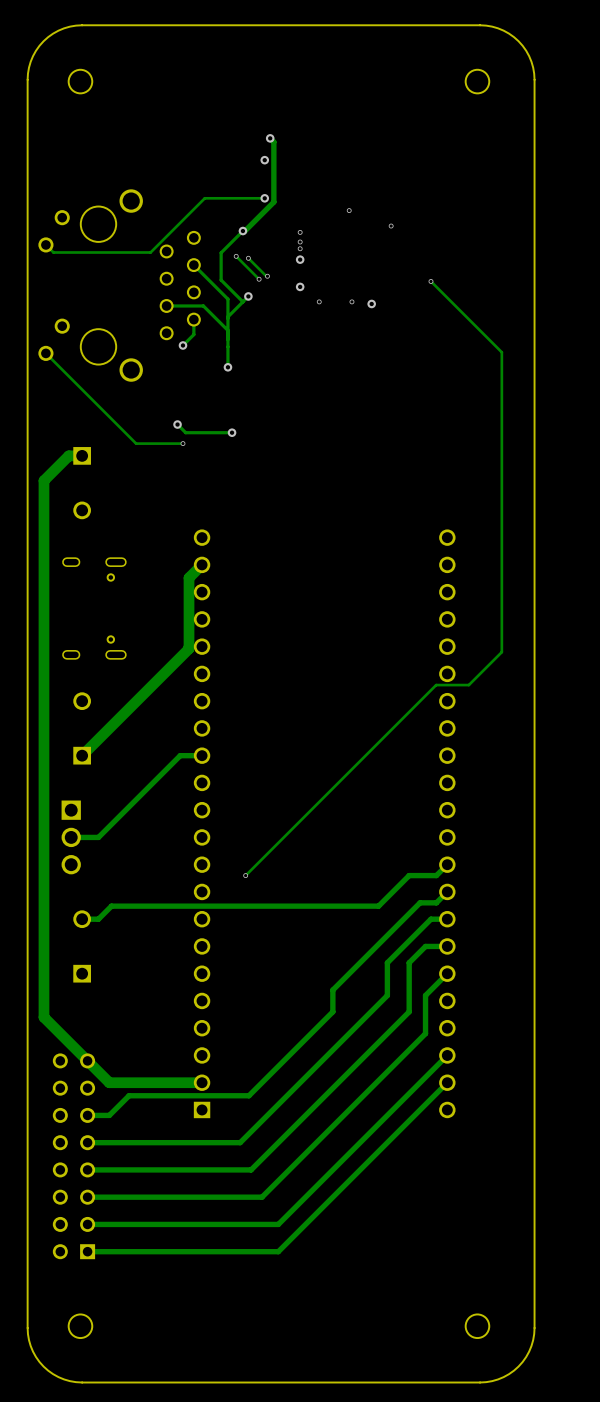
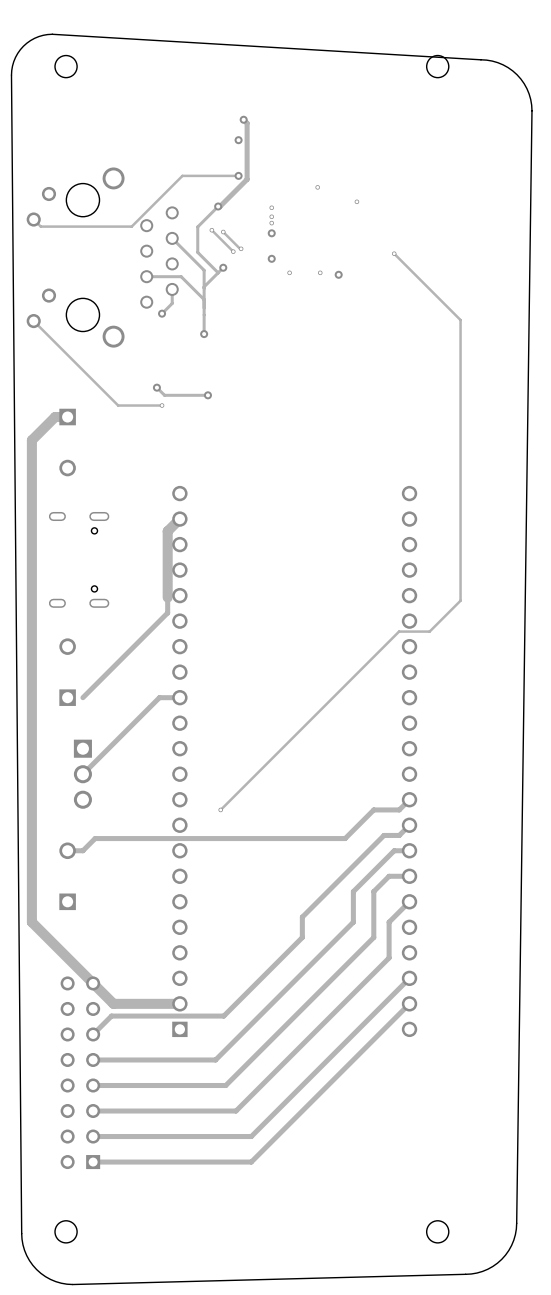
board edge: (480, 25) (76, 25) (58, 30) (48, 37) (39, 45) (30, 61) (27, 79) (27, 1328) (30, 1346) (39, 1361) (53, 1374) (64, 1379) (82, 1382) (486, 1382) (498, 1379) (514, 1370) (522, 1361) (531, 1346) (534, 1328) (534, 79) (529, 56) (518, 41) (503, 30) (480, 25) -> (52, 34) (486, 60) (497, 62) (512, 70) (524, 83) (529, 93) (531, 110) (516, 1223) (515, 1234) (508, 1250) (497, 1263) (482, 1271) (465, 1274) (72, 1284) (61, 1283) (45, 1276) (32, 1265) (24, 1250) (21, 1233) (11, 75) (15, 57) (23, 46) (34, 38) (52, 34)
track: (189, 648) (82, 755) -> (167, 597) (167, 612) (82, 697)
part position: (71, 837) -> (82, 774)
track: (98, 837) (71, 837) -> none
track: (43, 995) (43, 1017) (109, 1082) (131, 1082) -> (31, 922) (113, 1003)
track: (109, 1115) (87, 1115) -> none
track: (109, 1142) (87, 1142) -> none
part position: (73, 1156) -> (80, 1072)
track: (109, 1169) (87, 1169) -> none
track: (109, 1197) (87, 1197) -> none
track: (109, 1224) (87, 1224) -> none
track: (109, 1251) (87, 1251) -> none

